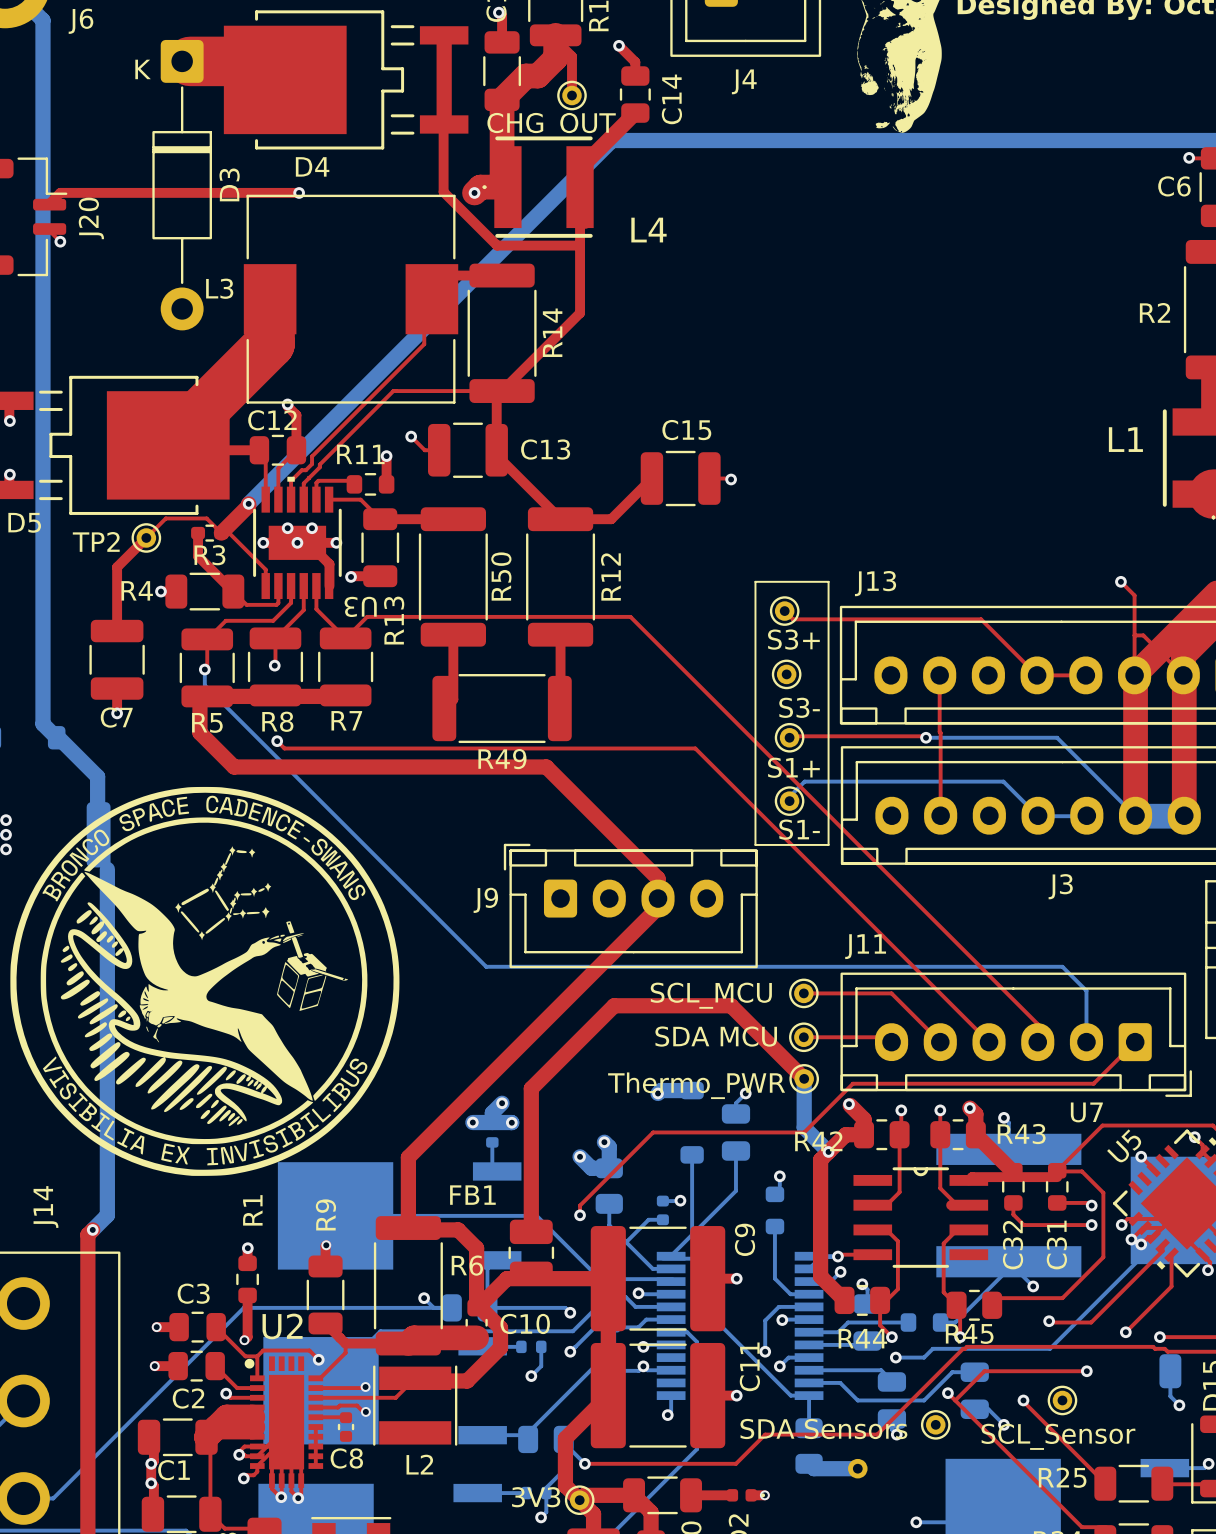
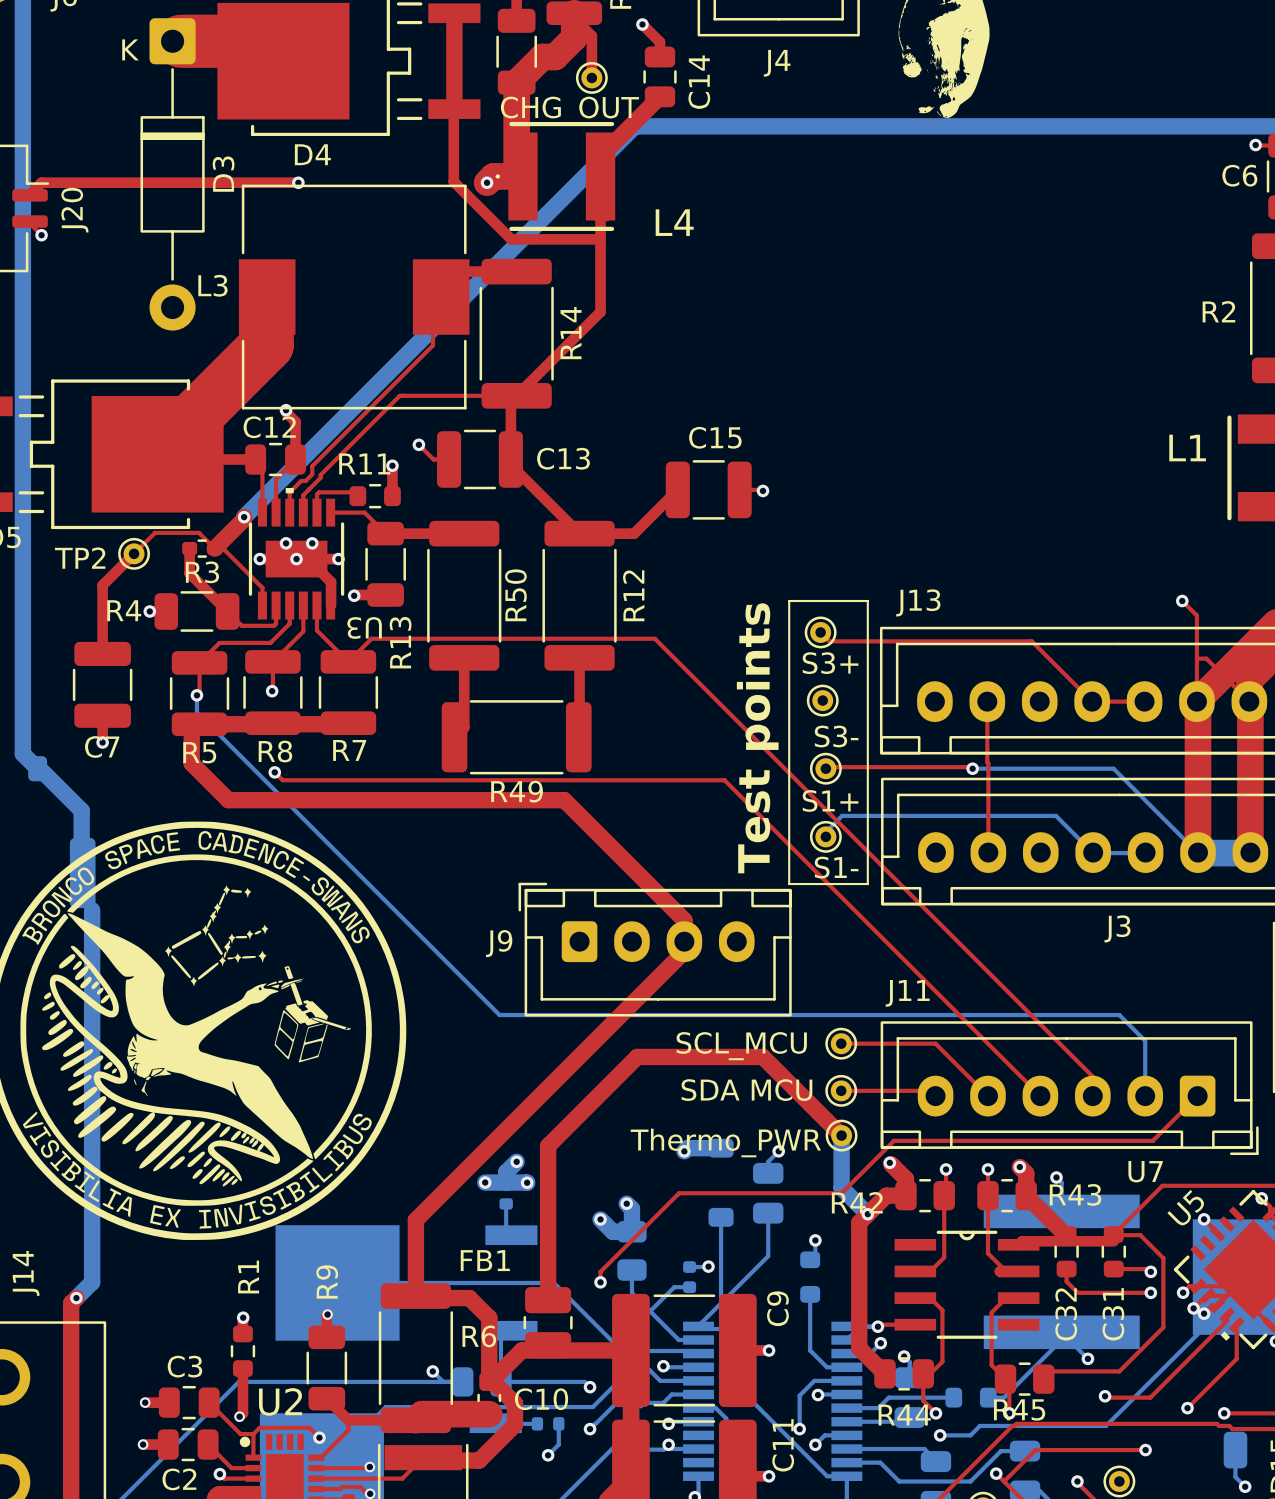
text: none -> Test points (757, 738)

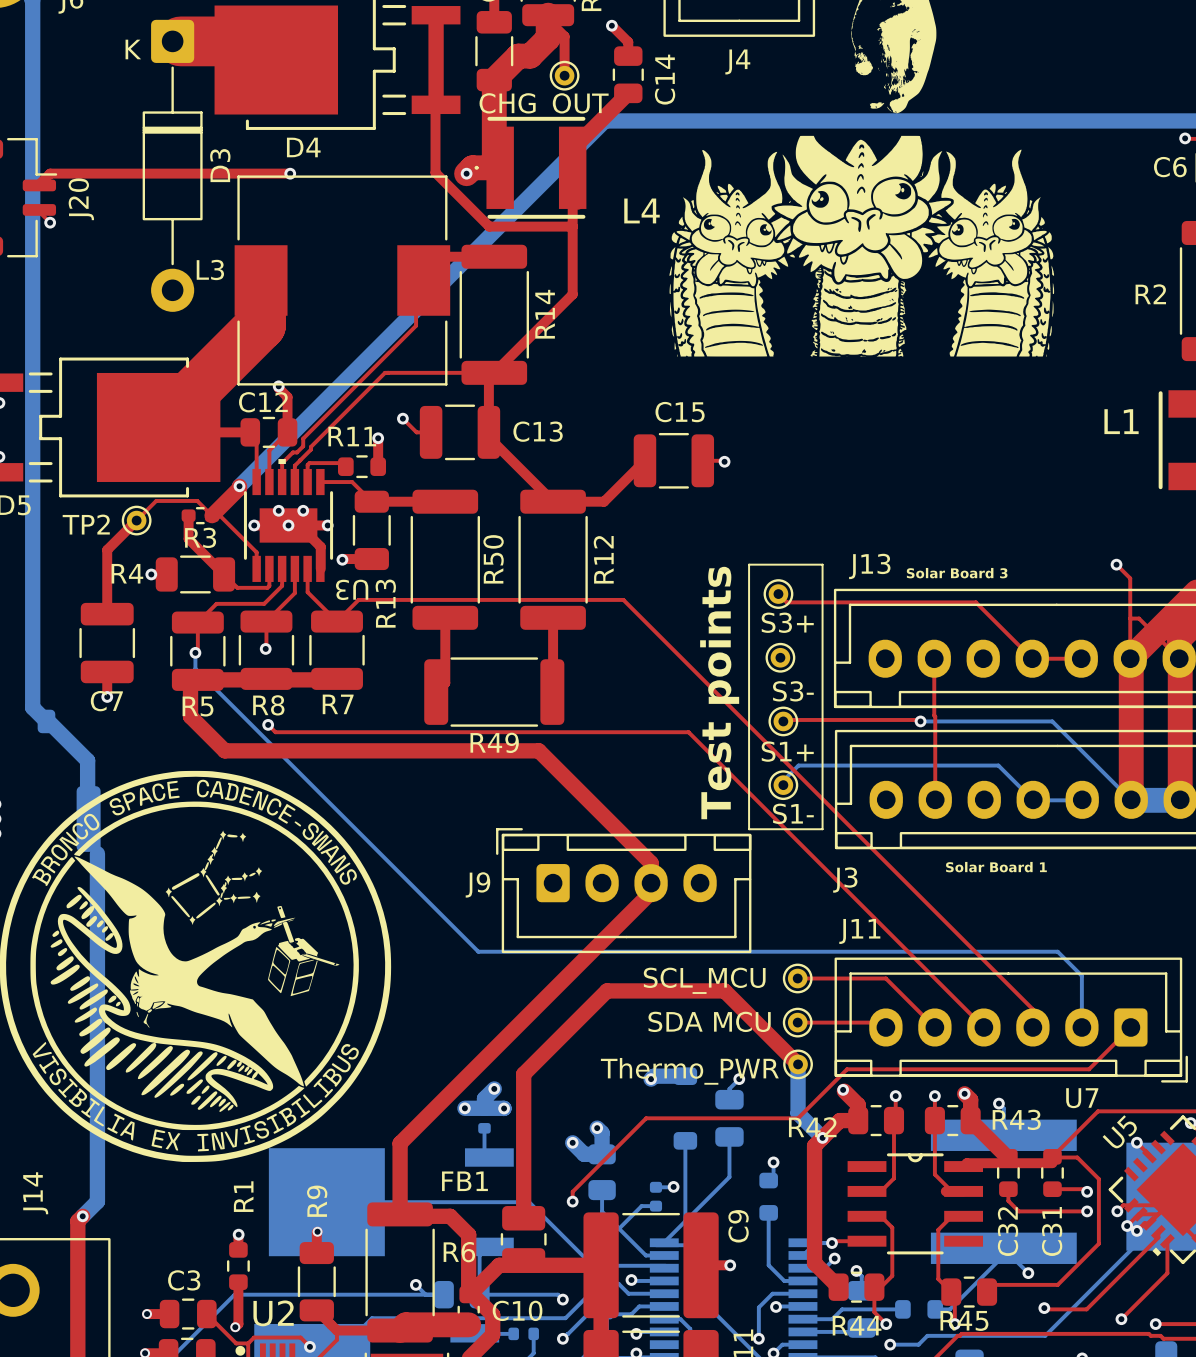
drawing: none -> [669, 135, 1055, 357]
text: none -> Solar Board 3 (957, 573)
text: none -> Solar Board 1 (996, 867)
J3 name position: J3 (1117, 928) -> J3 (845, 880)

